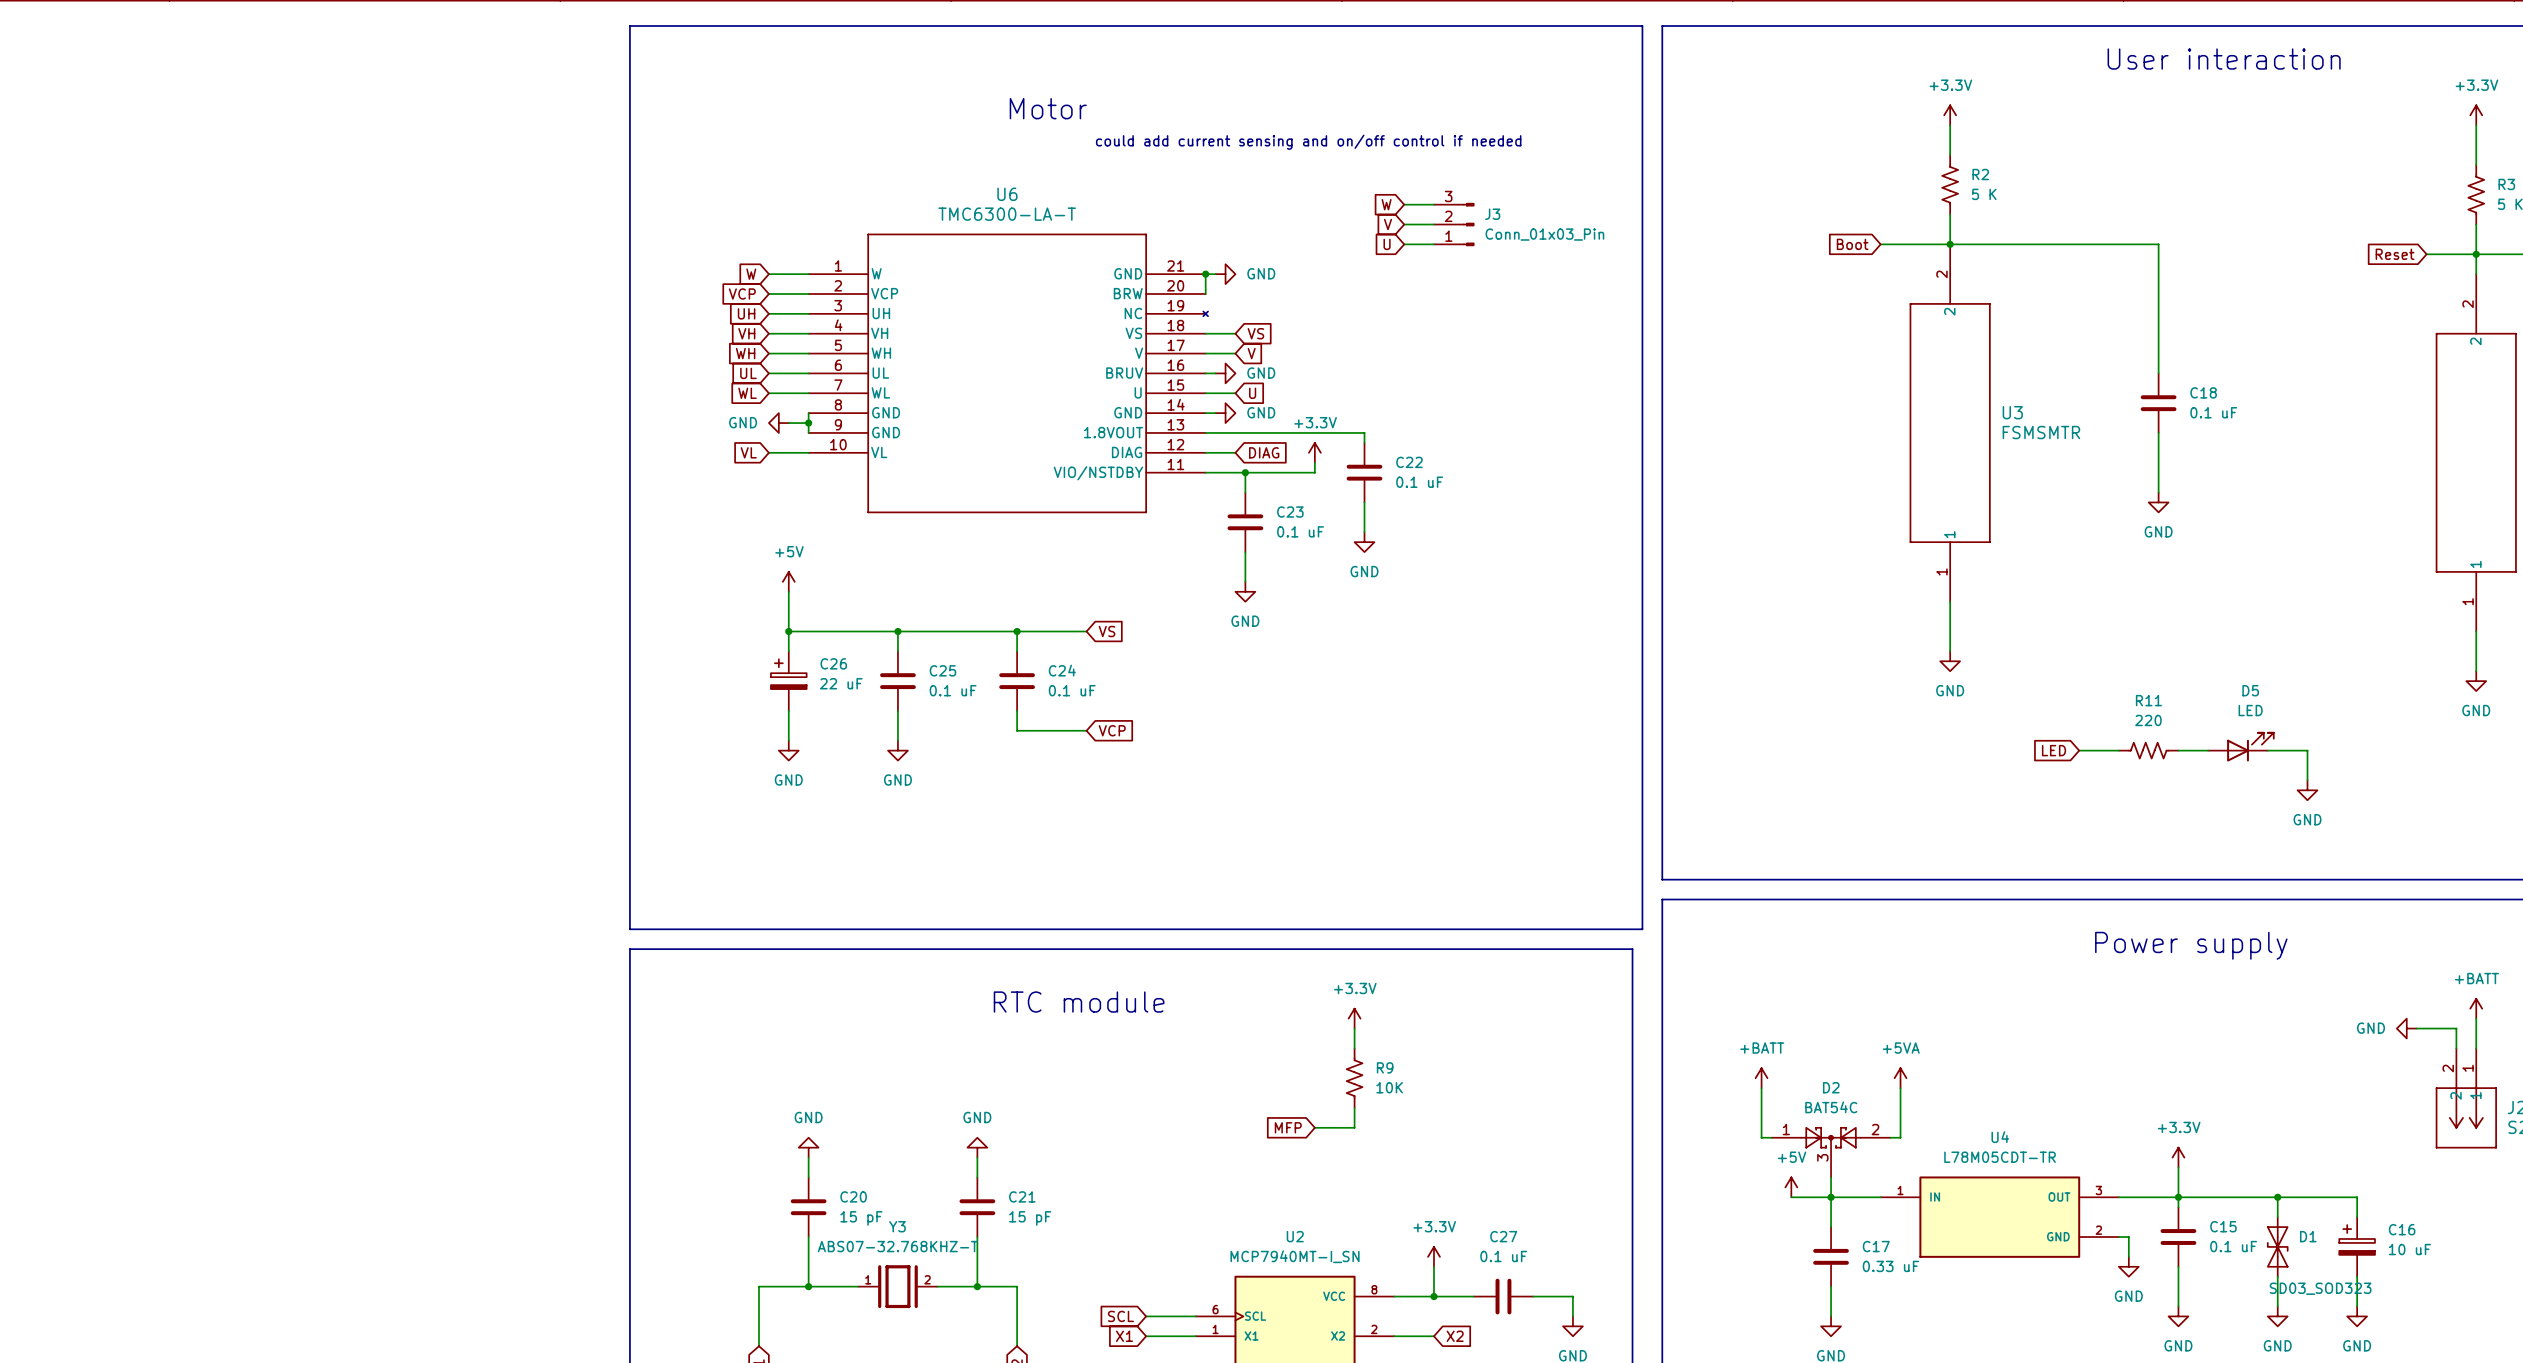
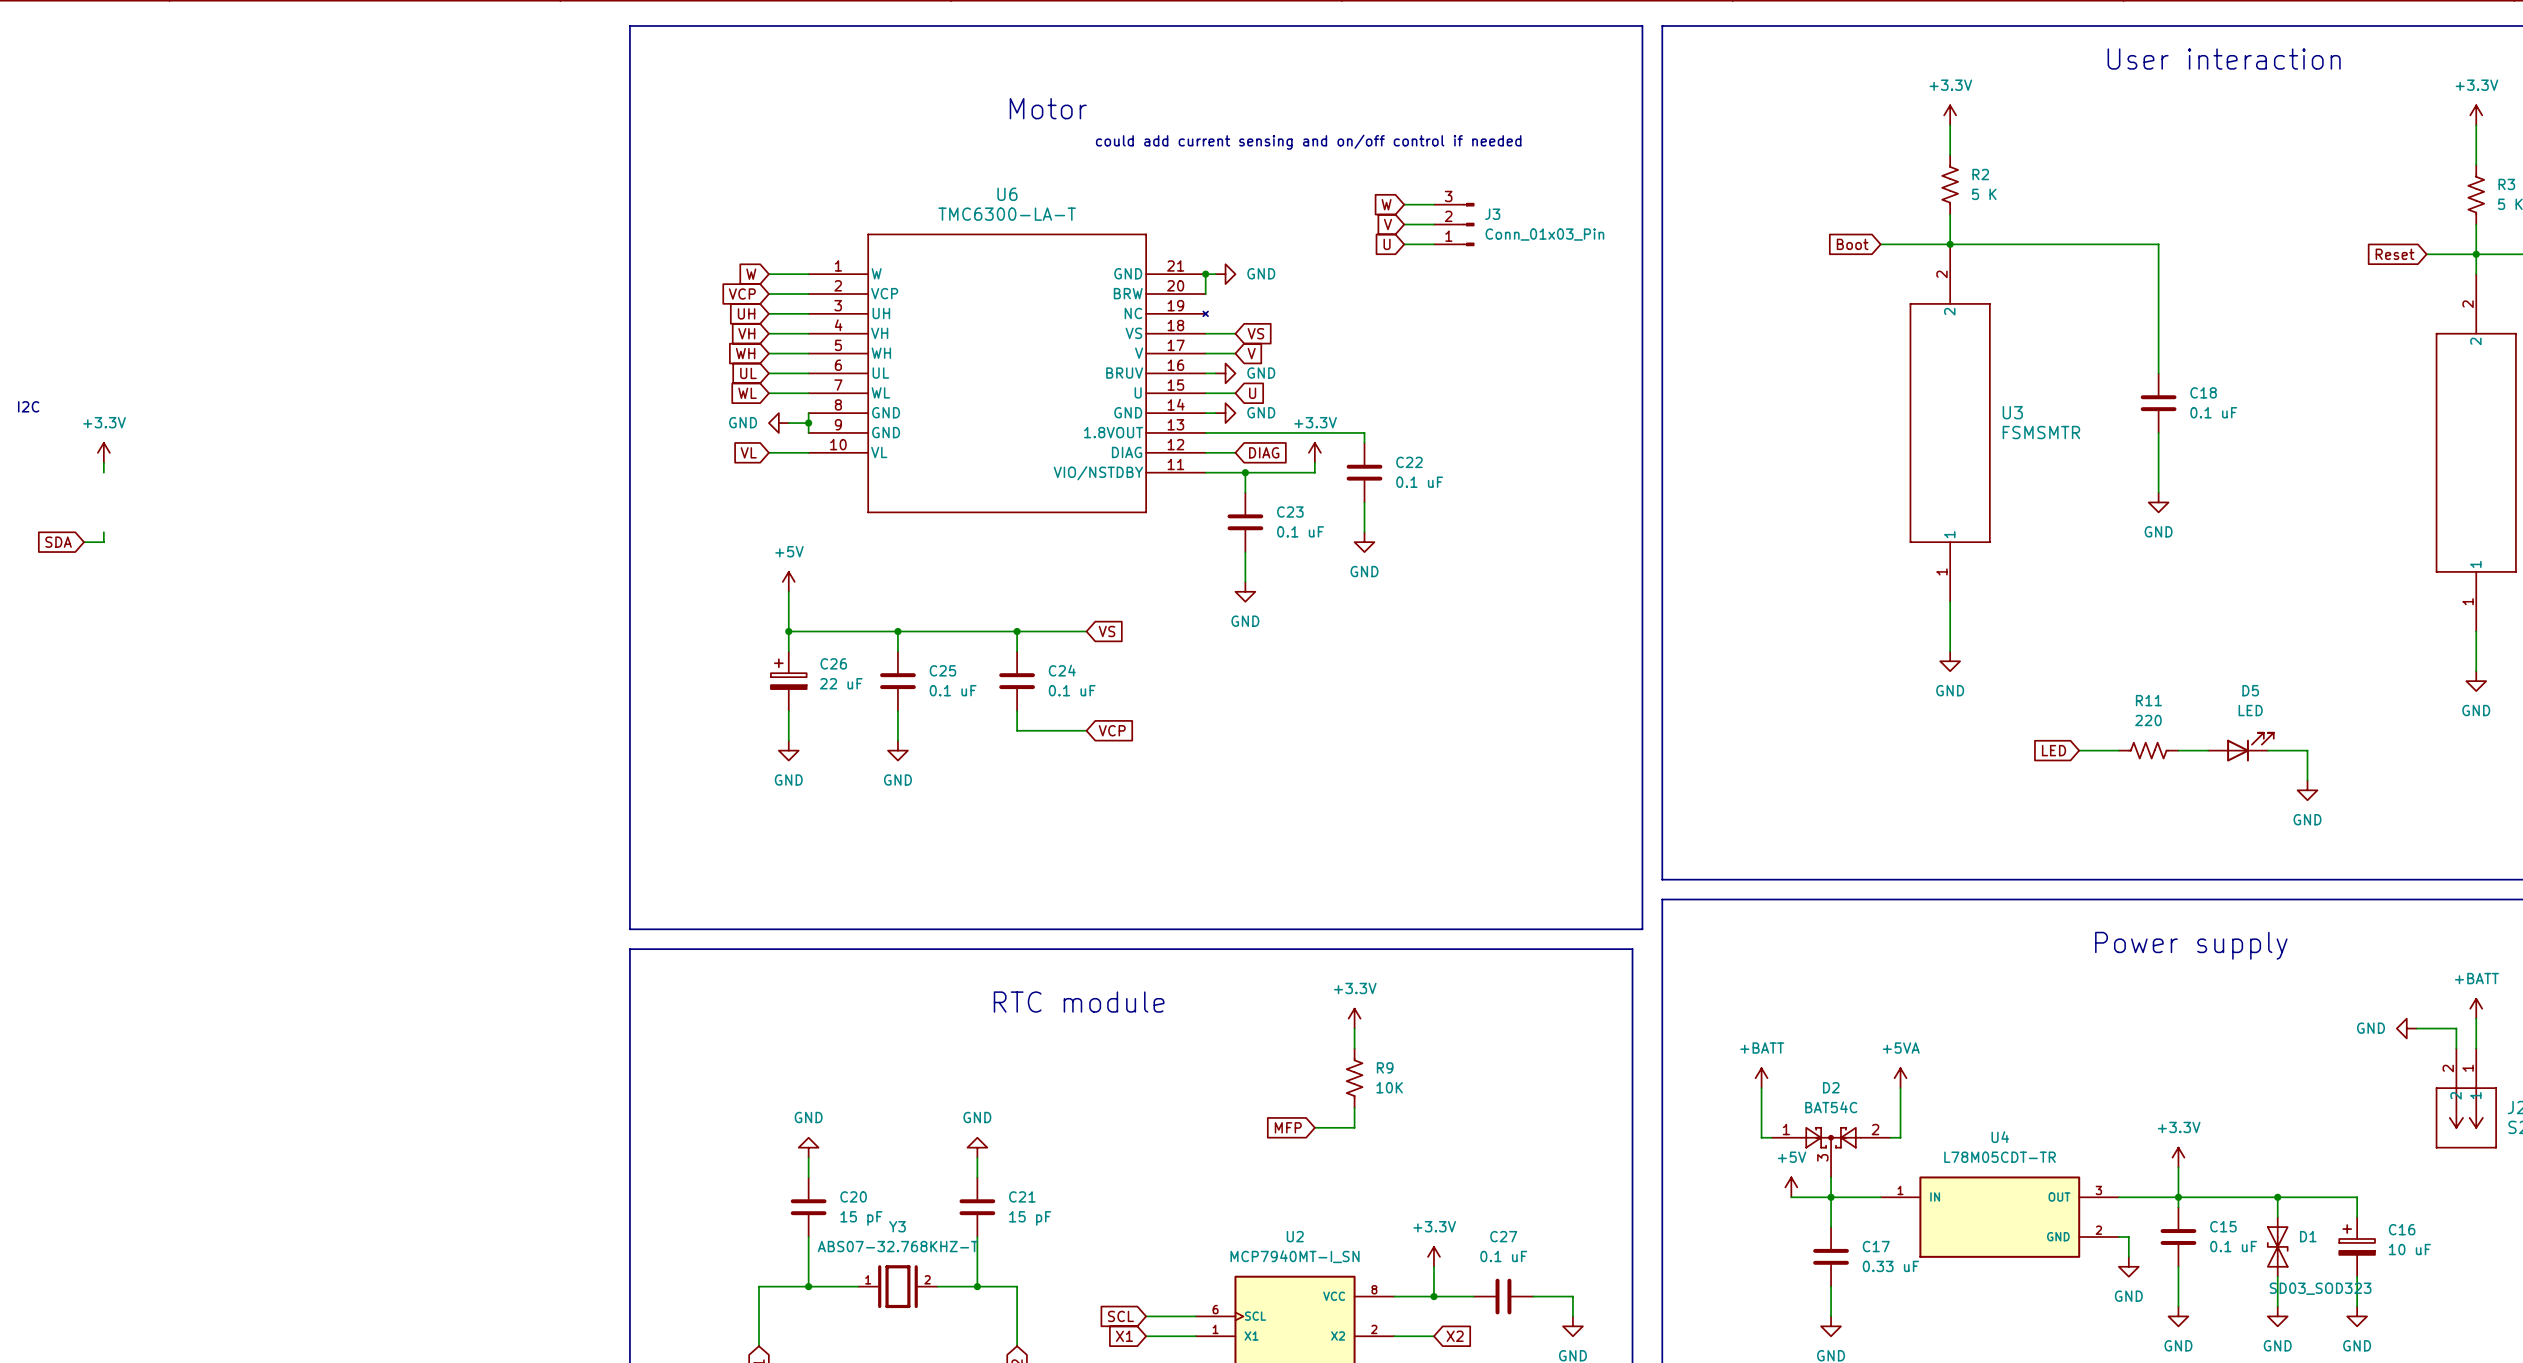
text: none -> I2C (28, 406)
power symbol: none -> +3.3V (103, 452)
wire: none -> (103, 462) (103, 472)
wire: none -> (103, 532) (103, 542) (84, 542)
global label: none -> SDA (58, 542)

